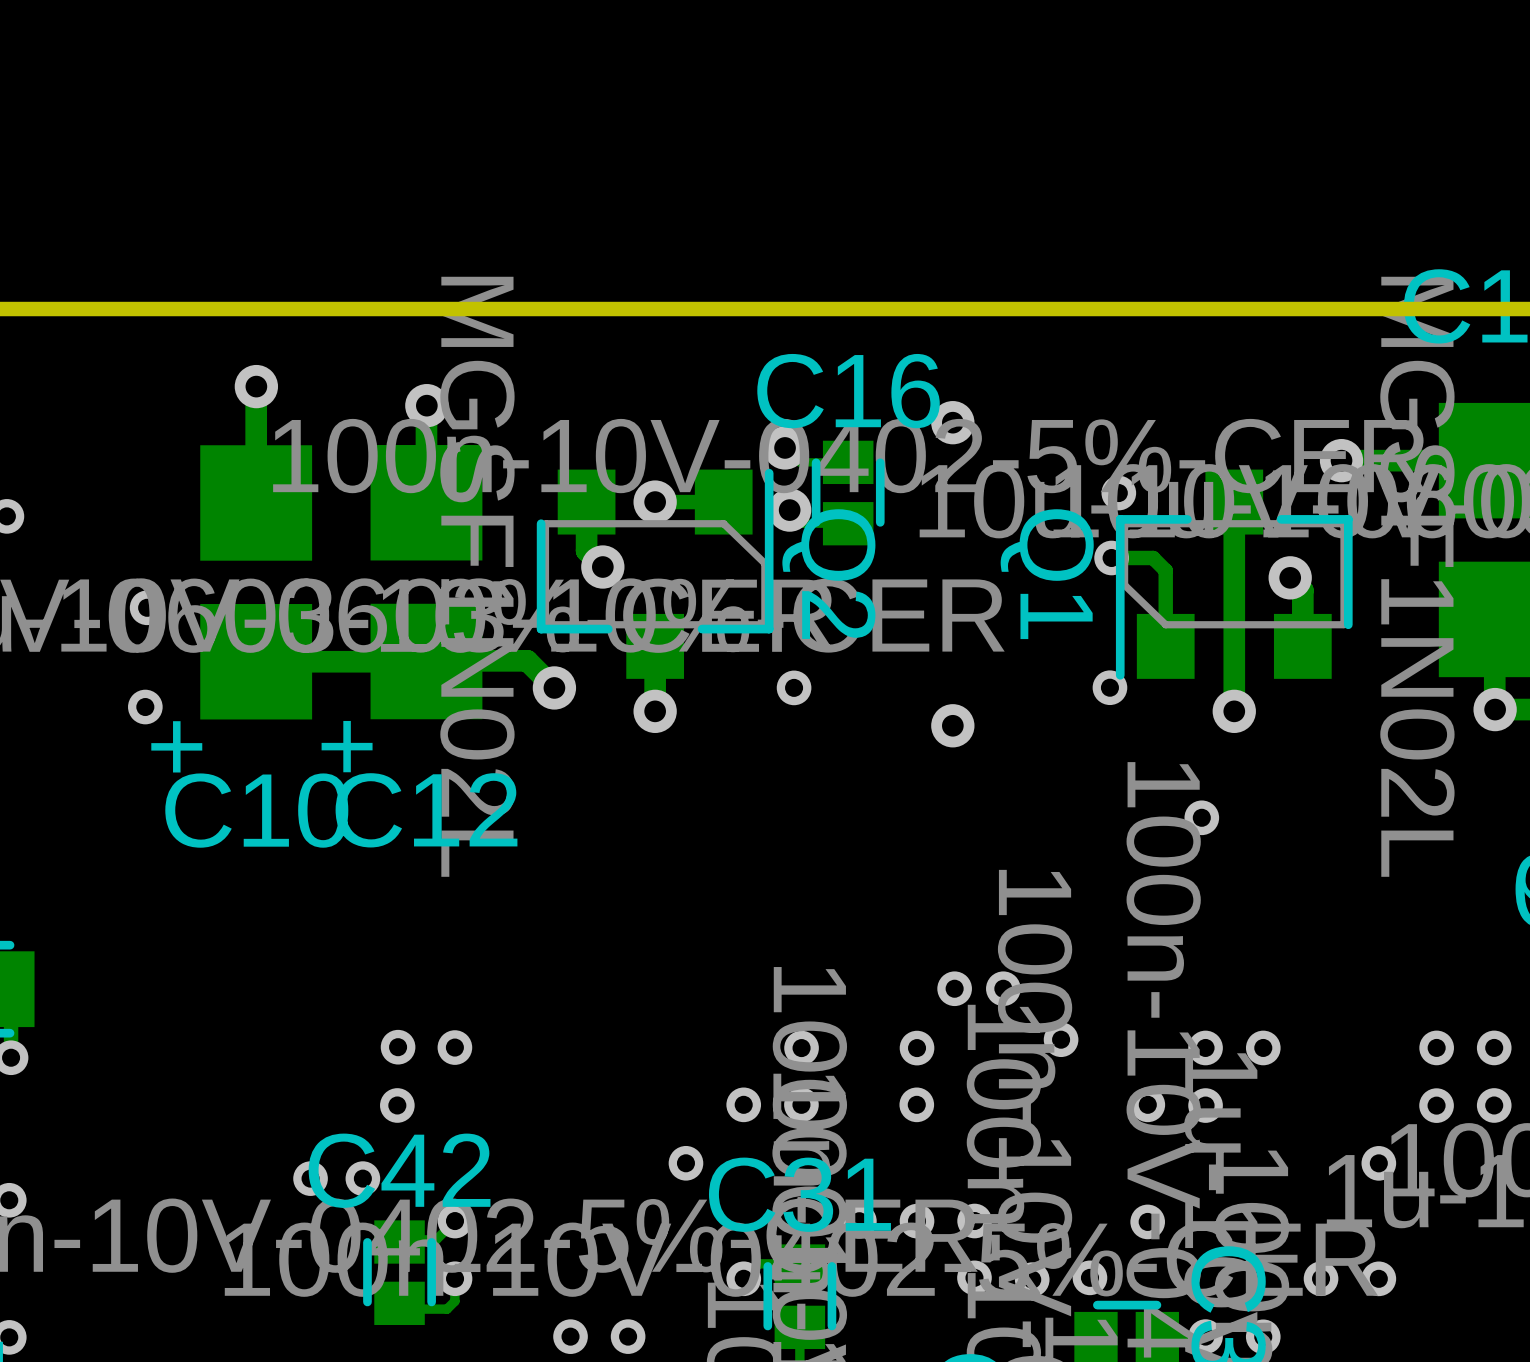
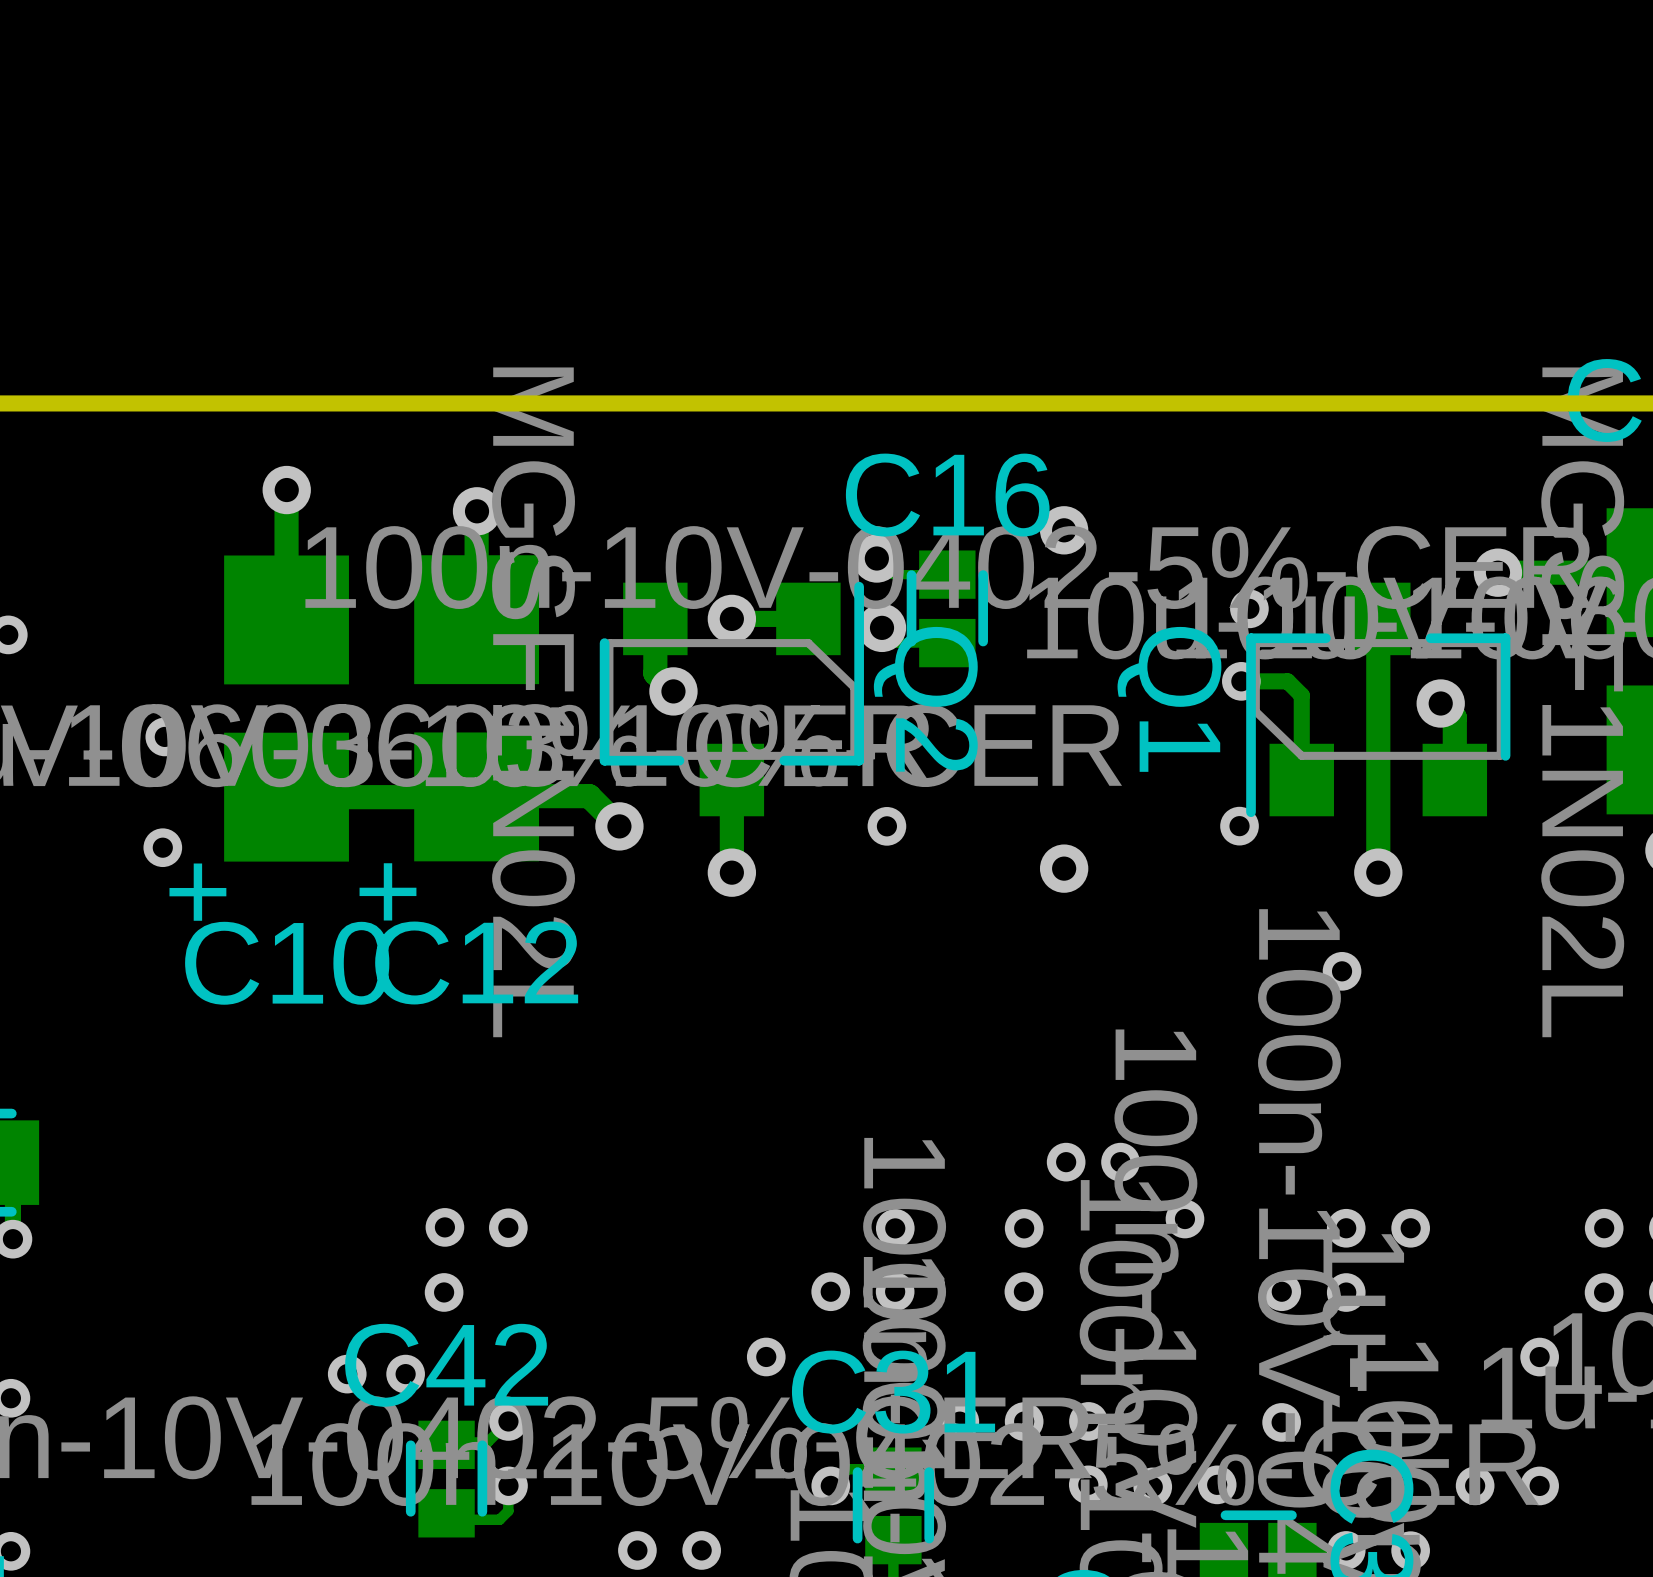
via position: (655, 711) -> (731, 872)
via position: (1234, 711) -> (1378, 872)

